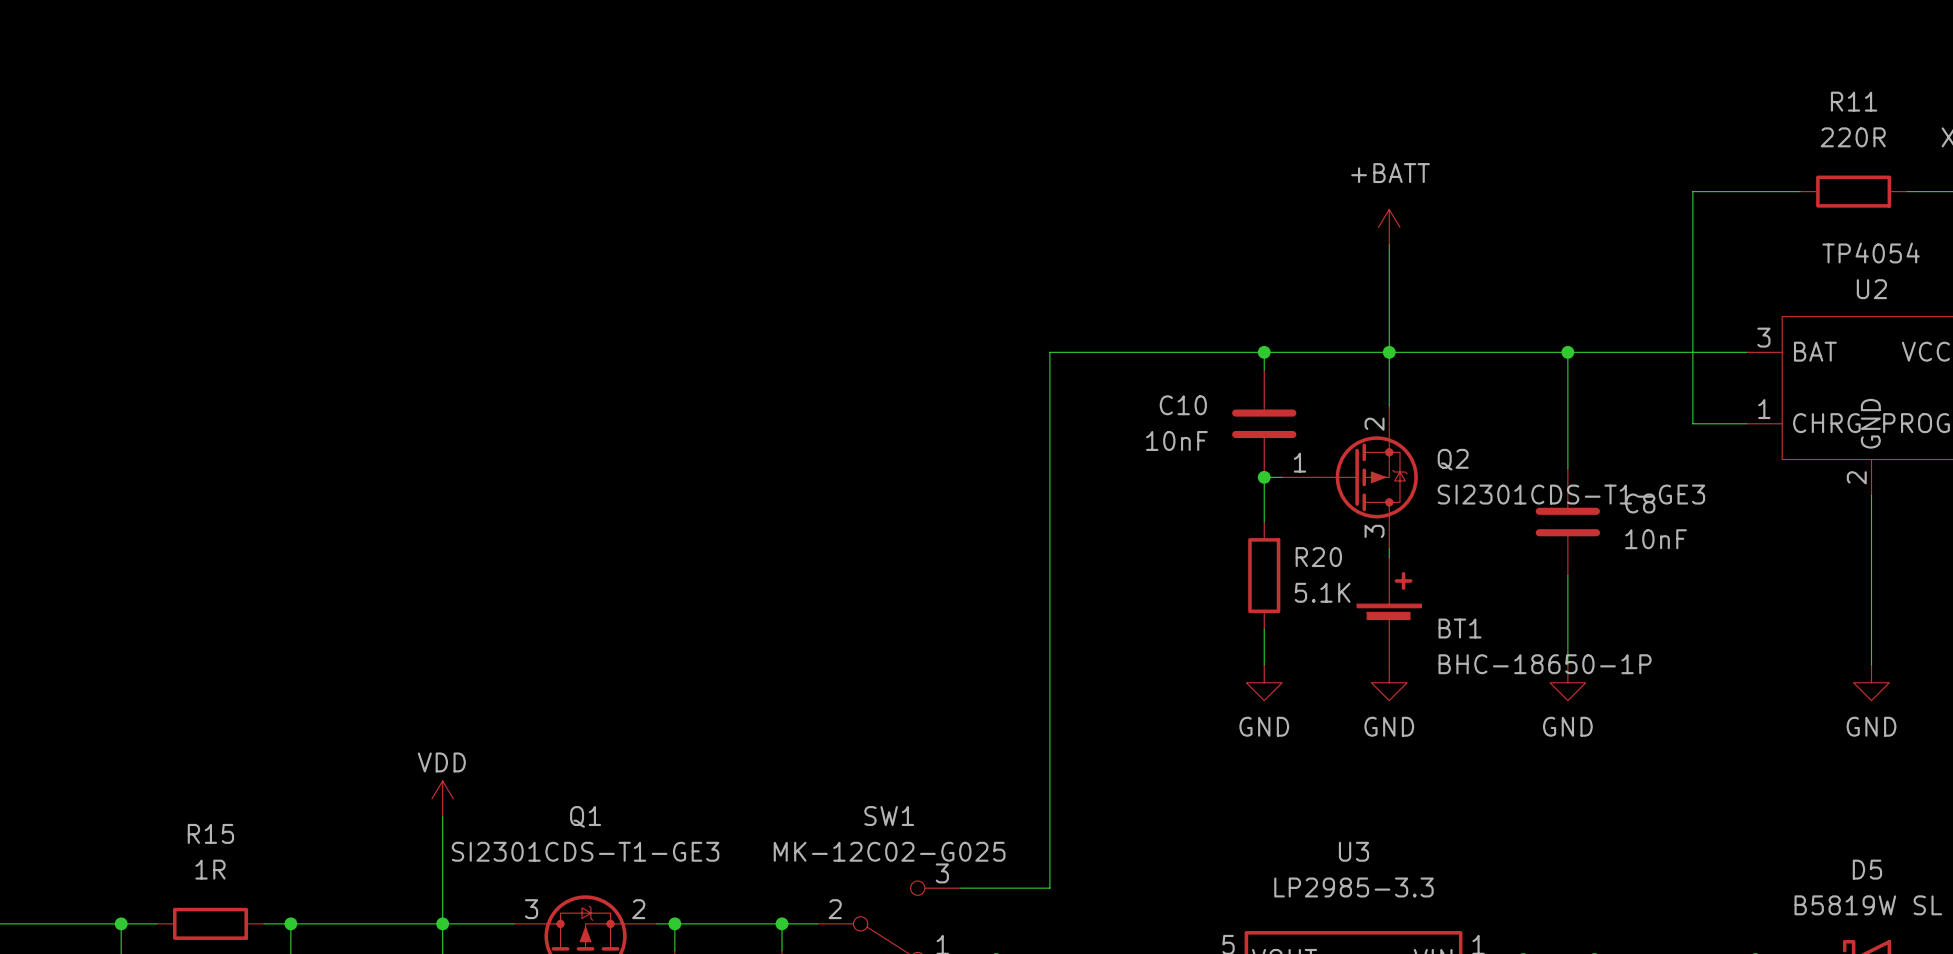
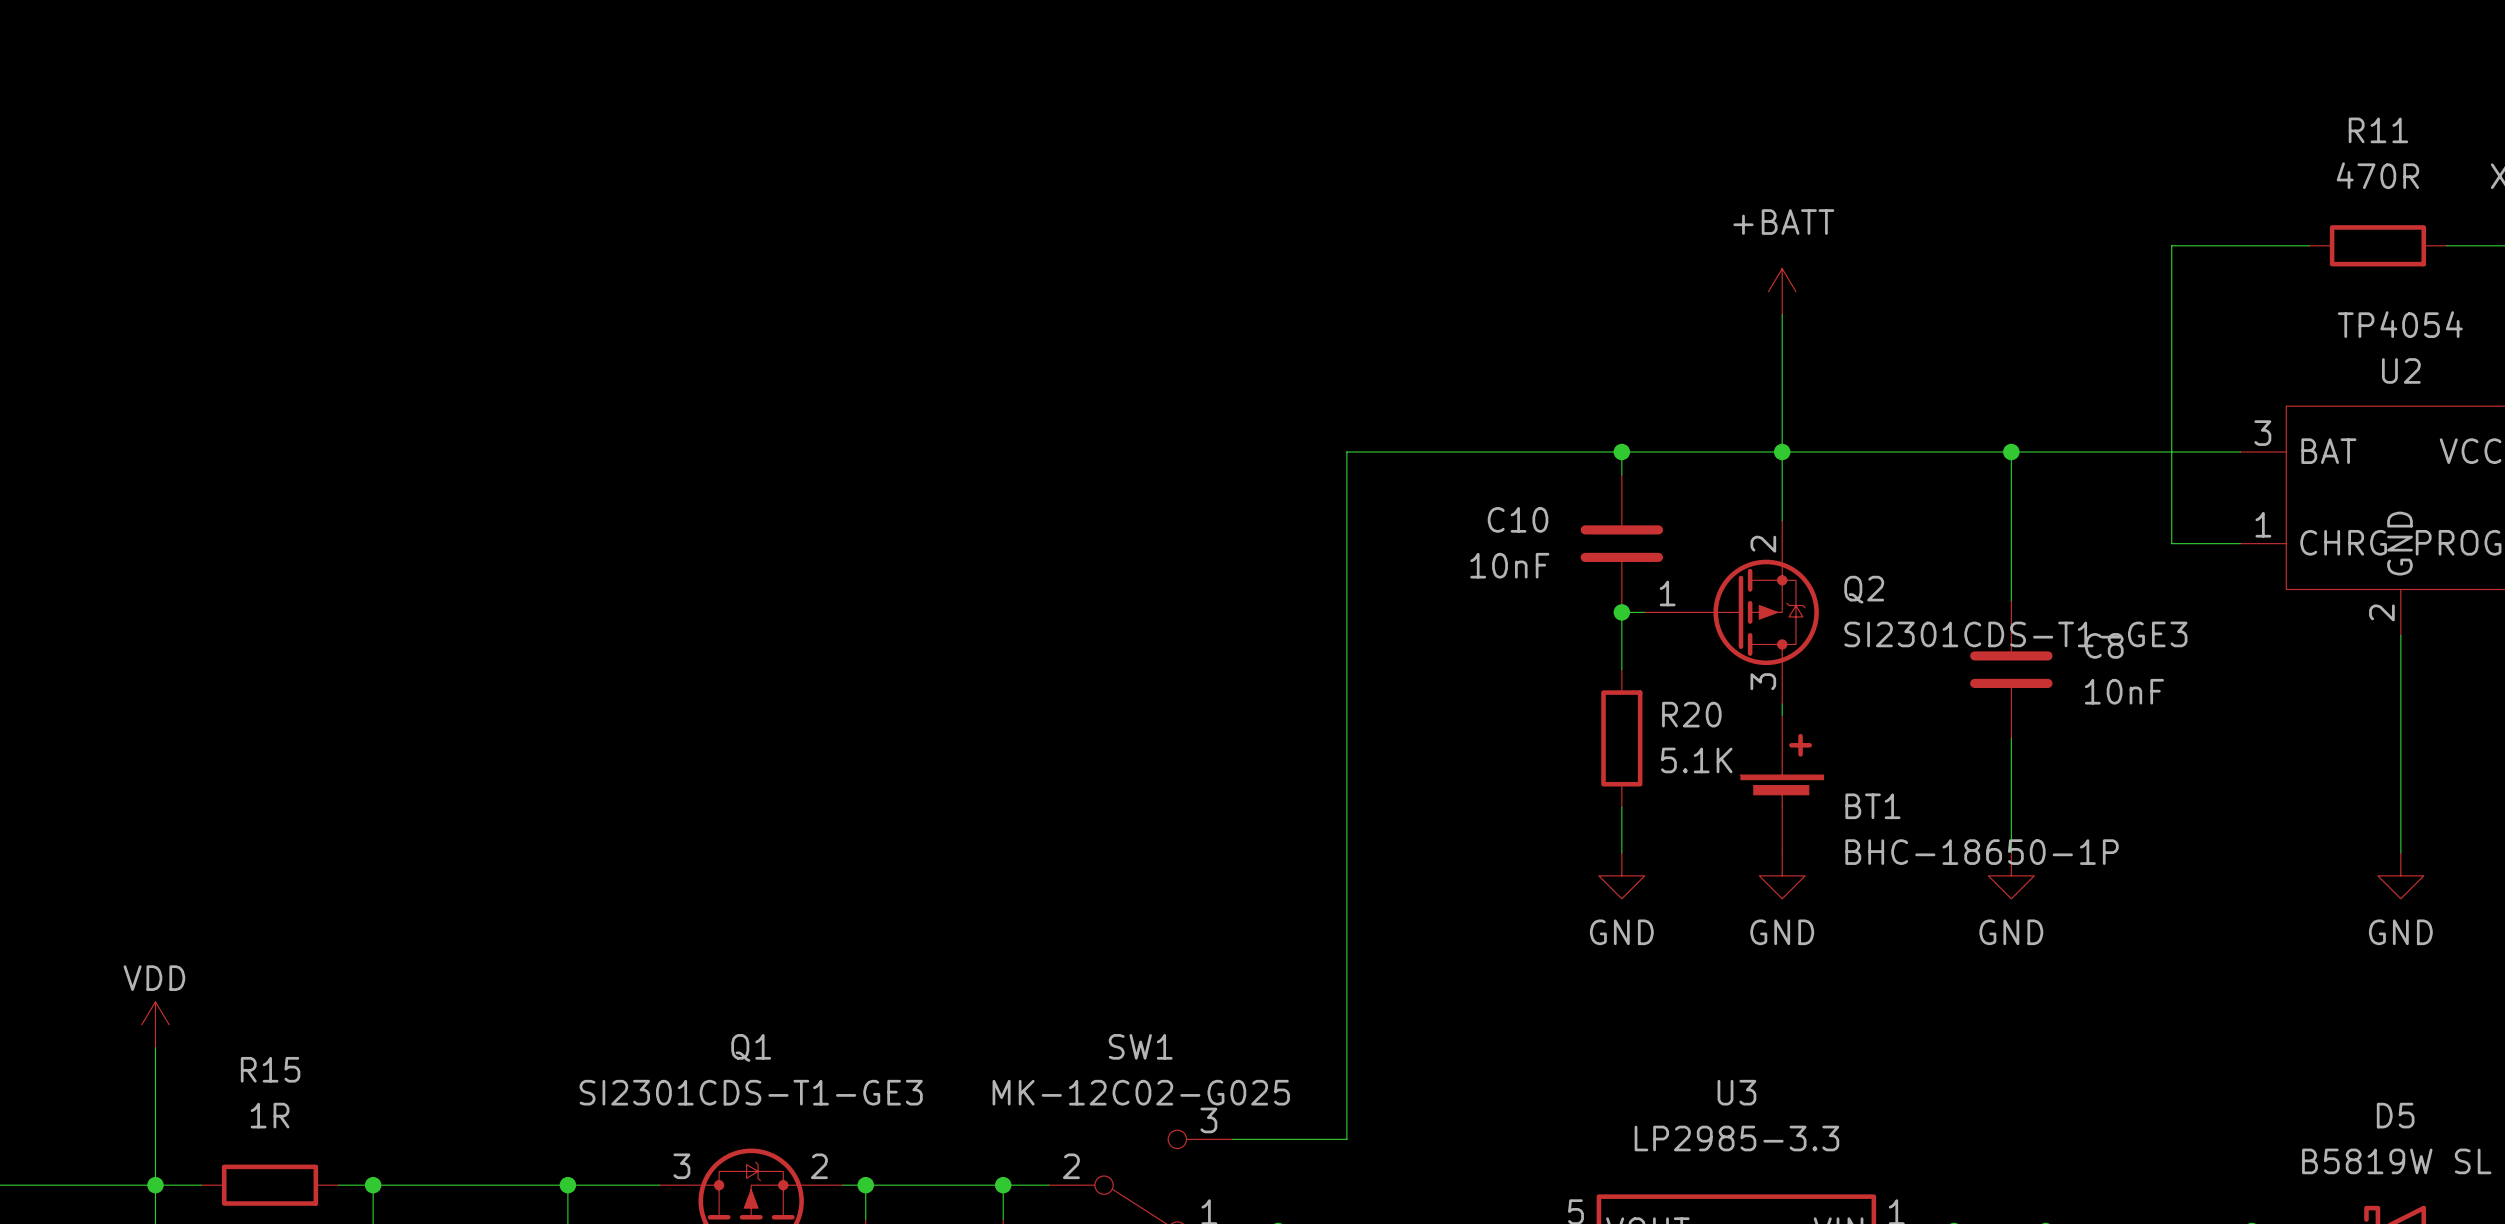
R11 value: 220R (1853, 137) -> 470R (2377, 175)
power symbol position: VDD (442, 798) -> VDD (155, 1024)
wire: (442, 816) (442, 923) -> (155, 1047) (155, 1185)

